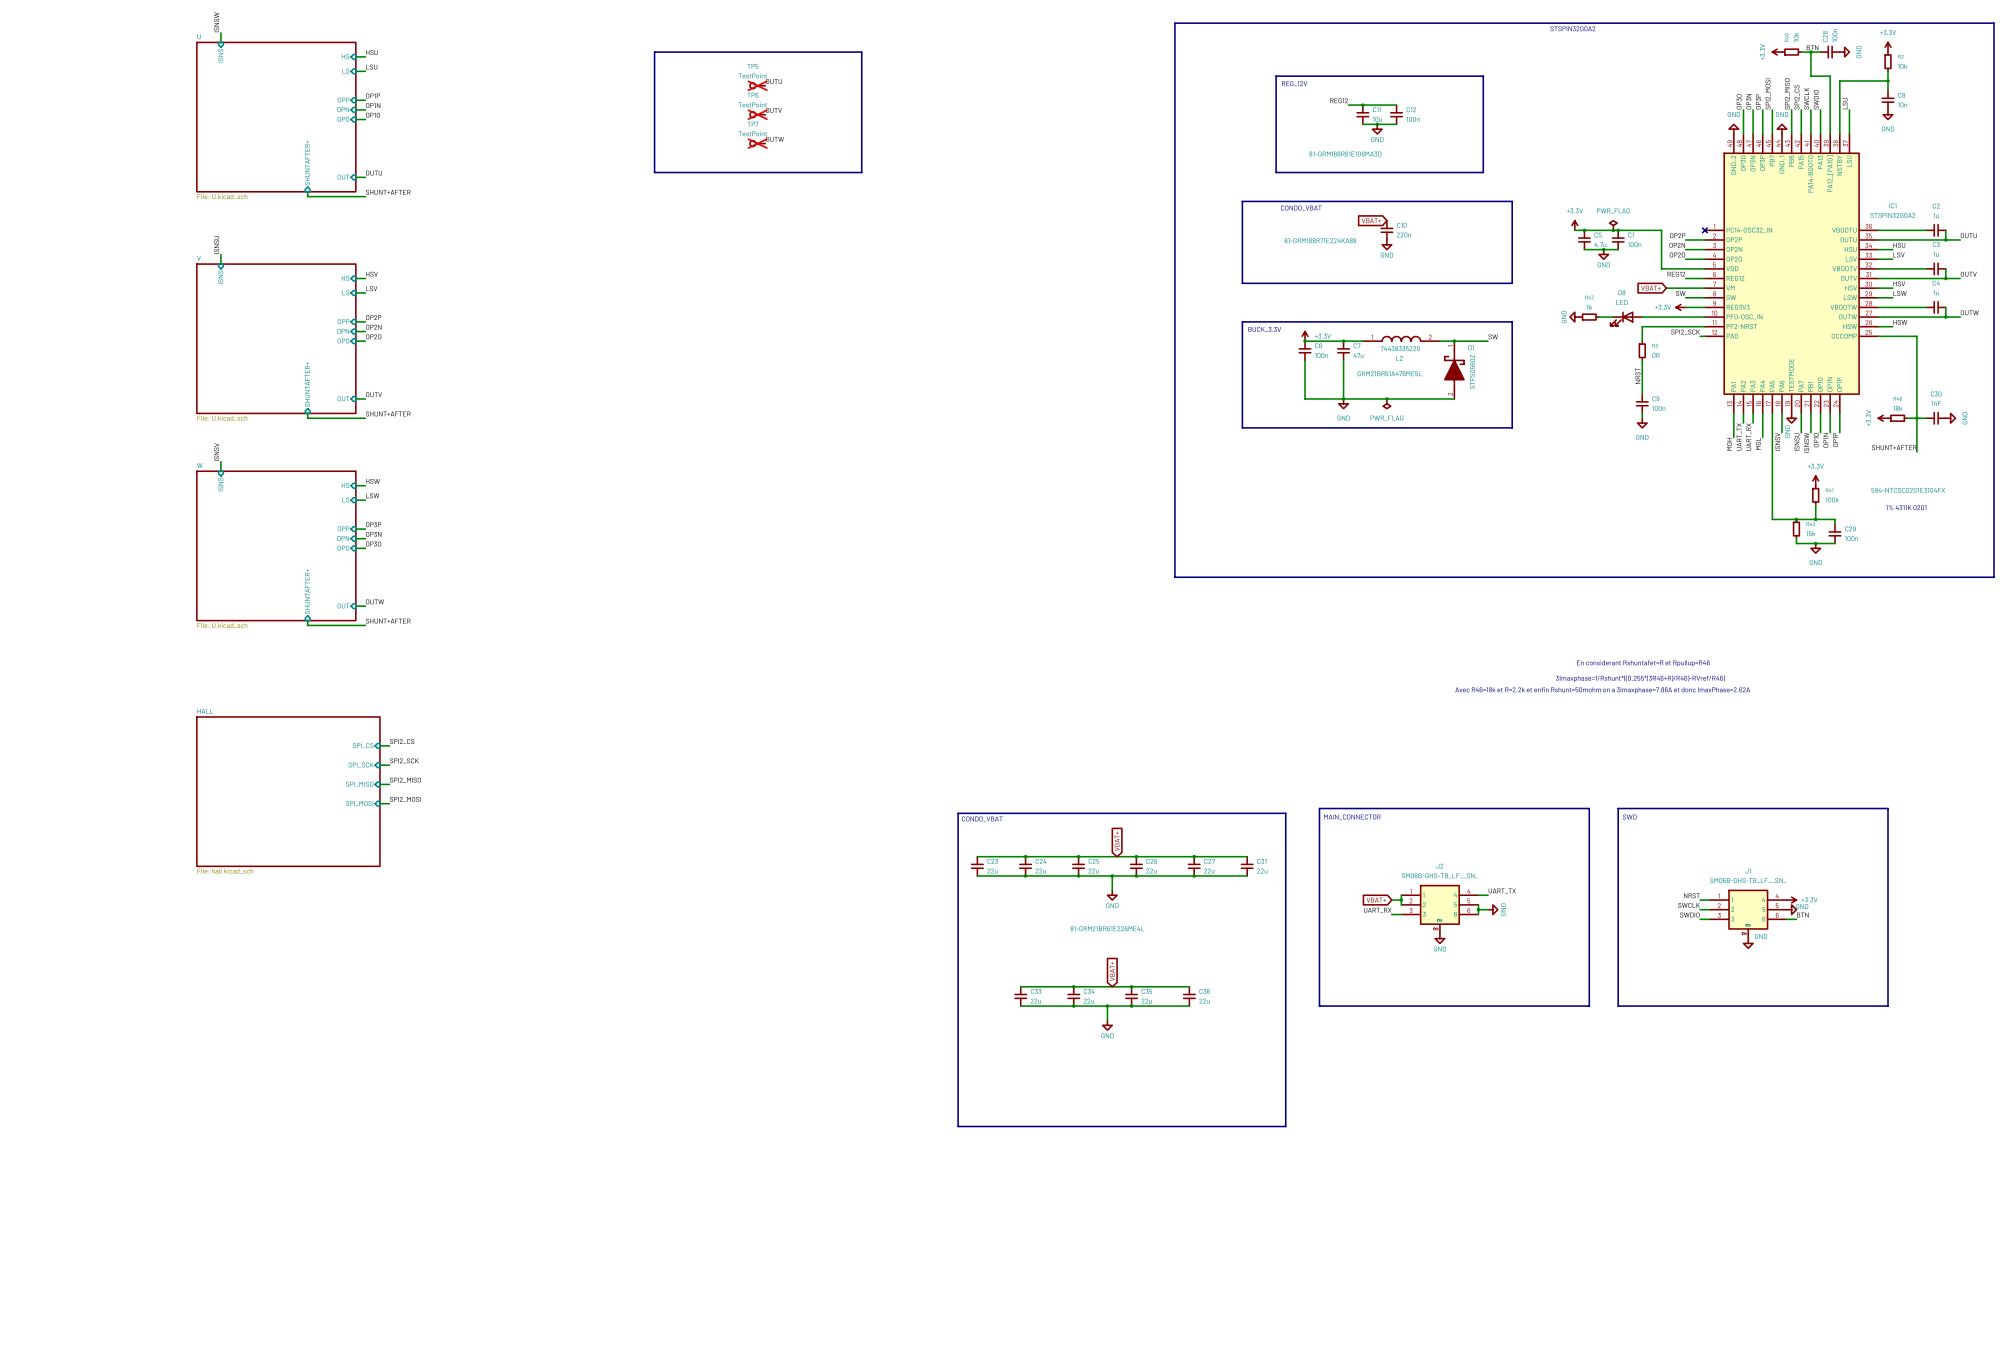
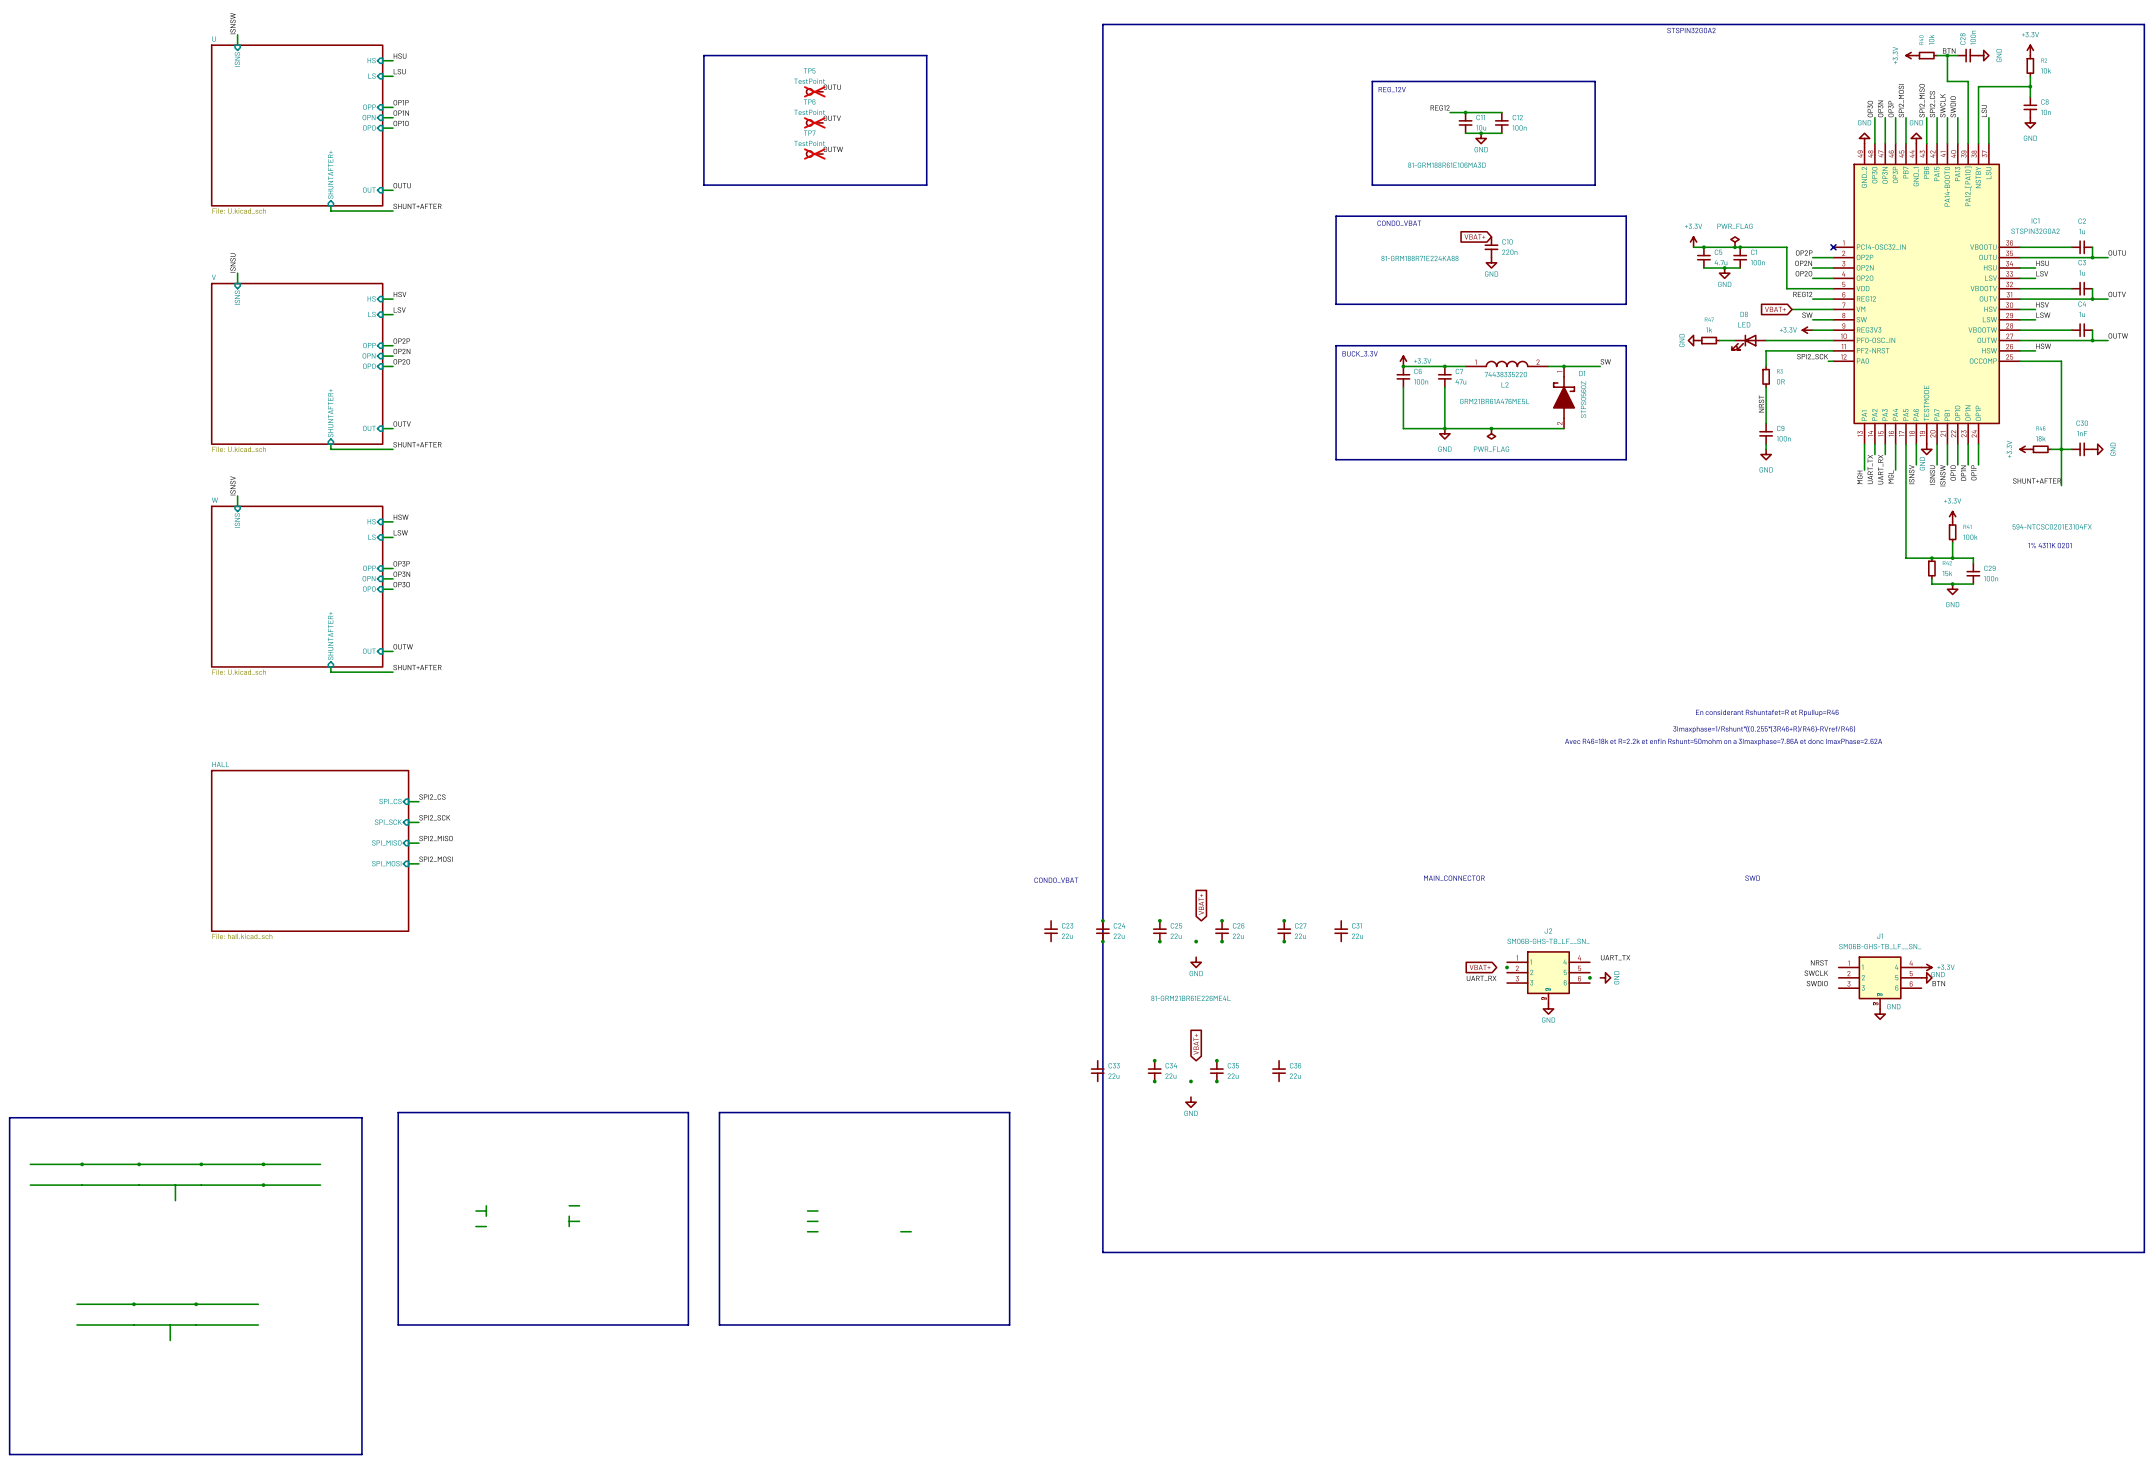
line: (1174, 23) (1174, 577) (1994, 577) -> (1263, 24) (1102, 24) (1102, 1252) (2144, 1252) (2144, 620)
line: (1319, 808) (1589, 808) (1589, 1006) (1319, 1006) (1319, 808) -> none
line: (1618, 808) (1888, 808) (1888, 1006) (1618, 1006) (1618, 808) -> none
line: (958, 813) (1285, 813) (1285, 1126) (958, 1126) (958, 813) -> none
wire: (977, 856) (1247, 856) -> none
wire: (977, 875) (1247, 875) -> none
wire: (1112, 875) (1112, 890) -> none
wire: (1401, 895) (1401, 904) -> none
wire: (1478, 895) (1488, 895) -> none
wire: (1391, 900) (1401, 900) -> none
wire: (1700, 900) (1709, 900) -> none
wire: (1478, 904) (1478, 914) -> none
wire: (1478, 909) (1488, 909) -> none
wire: (1700, 909) (1709, 909) -> none
wire: (1391, 914) (1401, 914) -> none
wire: (1700, 919) (1709, 919) -> none
wire: (1786, 919) (1796, 919) -> none
wire: (1020, 986) (1189, 986) -> none
wire: (1020, 1006) (1189, 1006) -> none
wire: (1107, 1006) (1107, 1020) -> none
line: none -> (398, 1112) (688, 1112) (688, 1325) (398, 1325) (398, 1112)
line: none -> (719, 1112) (1009, 1112) (1009, 1325) (719, 1325) (719, 1112)
line: none -> (9, 1117) (361, 1117) (361, 1454) (9, 1454) (9, 1117)
wire: none -> (30, 1164) (320, 1164)
junction: none -> (82, 1164)
junction: none -> (139, 1164)
junction: none -> (201, 1164)
junction: none -> (263, 1164)
wire: none -> (30, 1185) (320, 1185)
wire: none -> (175, 1185) (175, 1200)
junction: none -> (263, 1185)
wire: none -> (486, 1205) (486, 1216)
wire: none -> (569, 1205) (579, 1205)
wire: none -> (475, 1211) (486, 1211)
wire: none -> (807, 1211) (817, 1211)
wire: none -> (569, 1216) (569, 1226)
wire: none -> (569, 1221) (579, 1221)
wire: none -> (807, 1221) (817, 1221)
wire: none -> (475, 1226) (486, 1226)
wire: none -> (807, 1231) (817, 1231)
wire: none -> (900, 1231) (911, 1231)
wire: none -> (76, 1304) (258, 1304)
junction: none -> (133, 1304)
junction: none -> (196, 1304)
wire: none -> (76, 1325) (258, 1325)
wire: none -> (170, 1325) (170, 1340)

